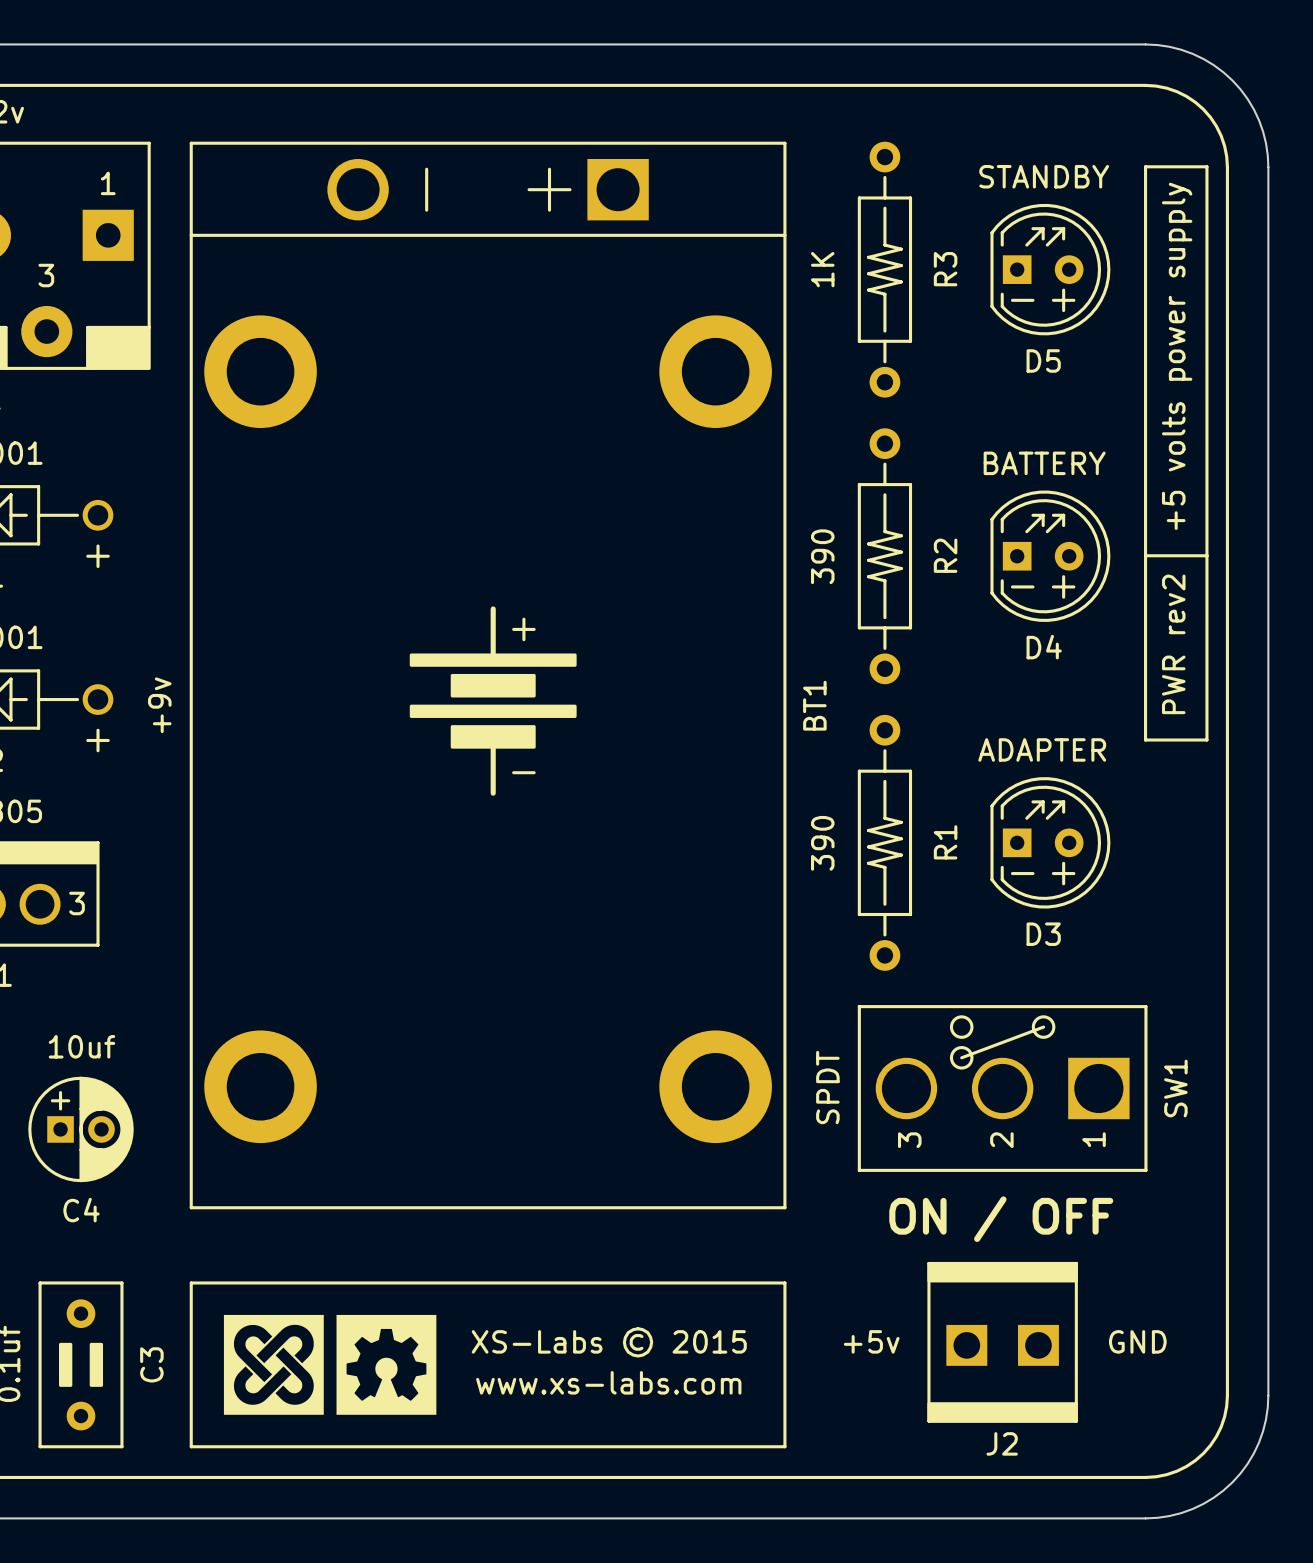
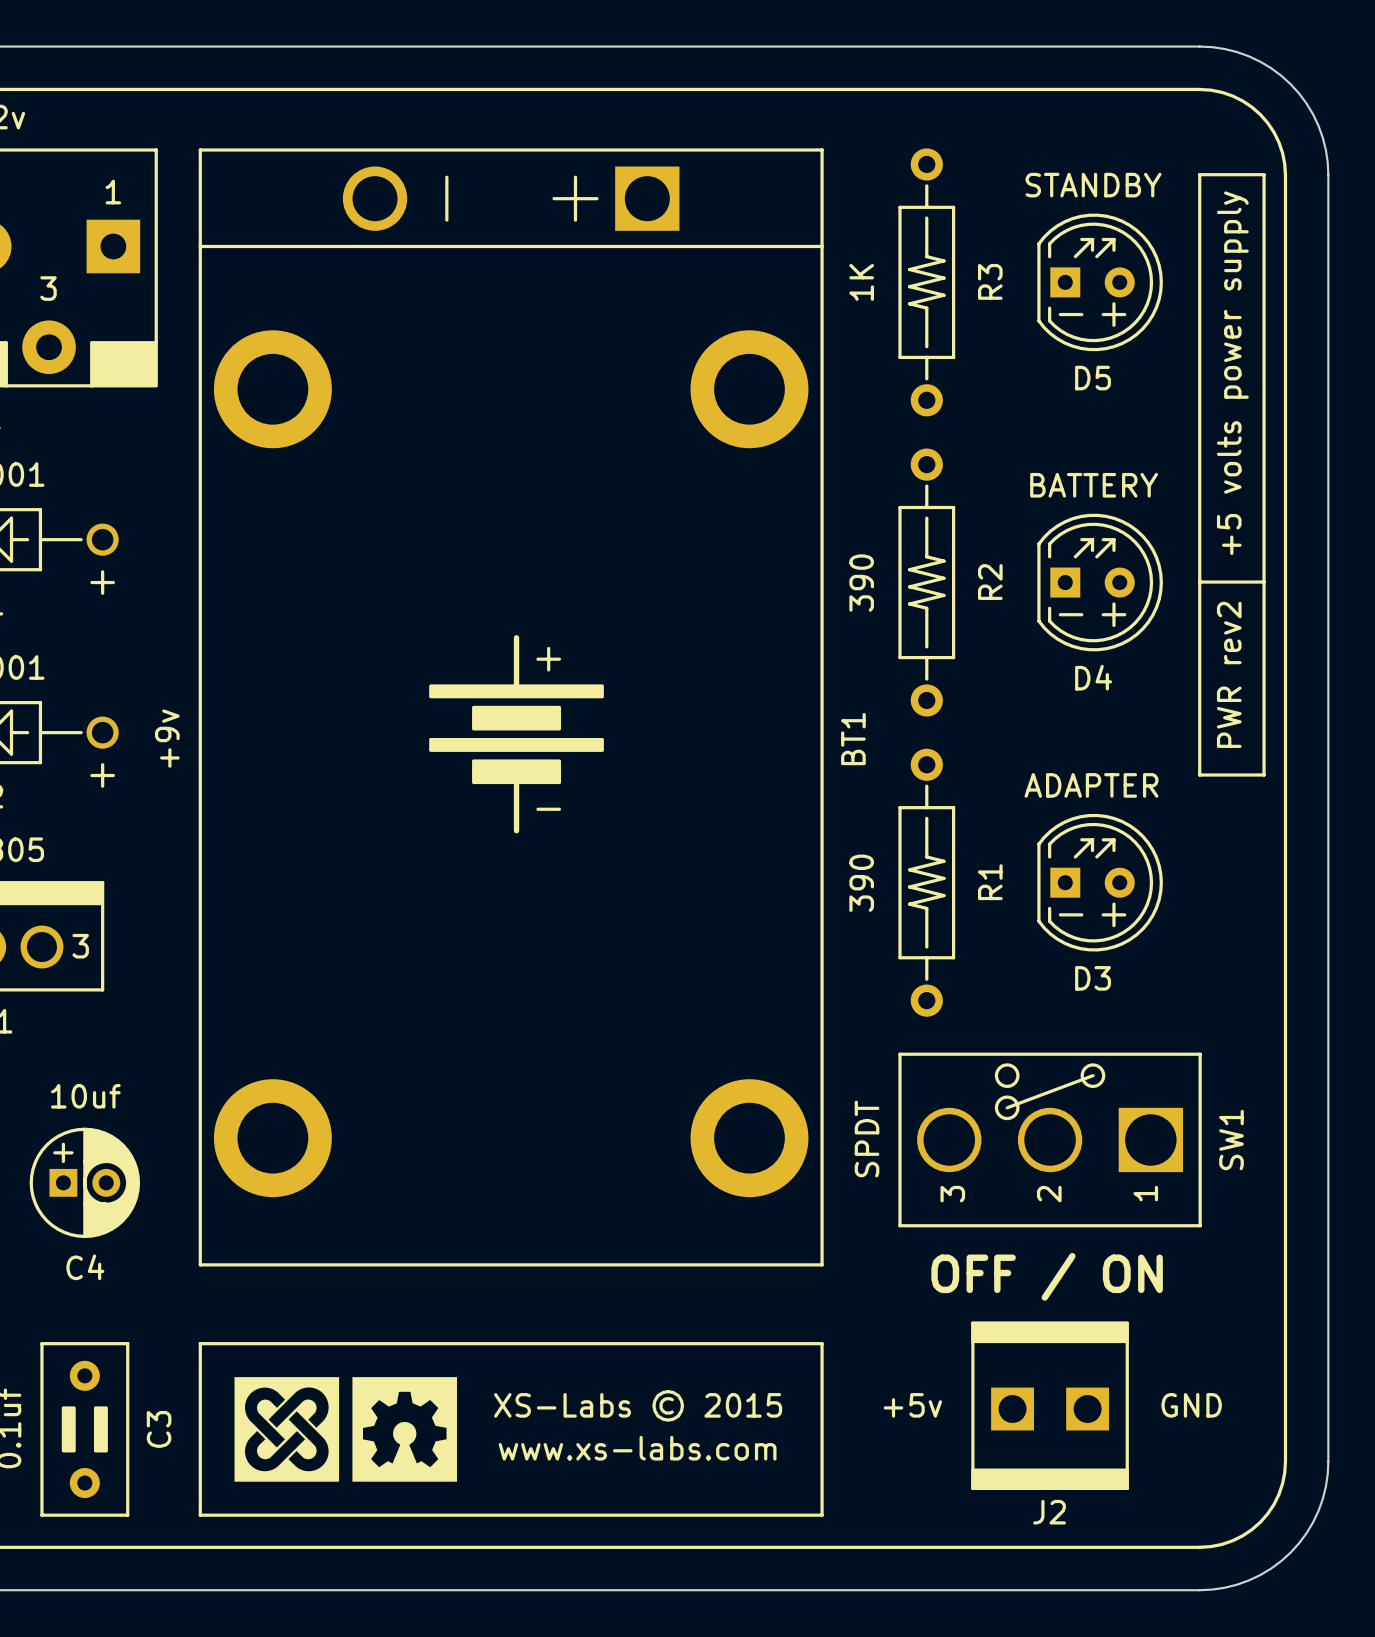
text: ON / OFF (1001, 1219) -> OFF / ON (1047, 1276)

